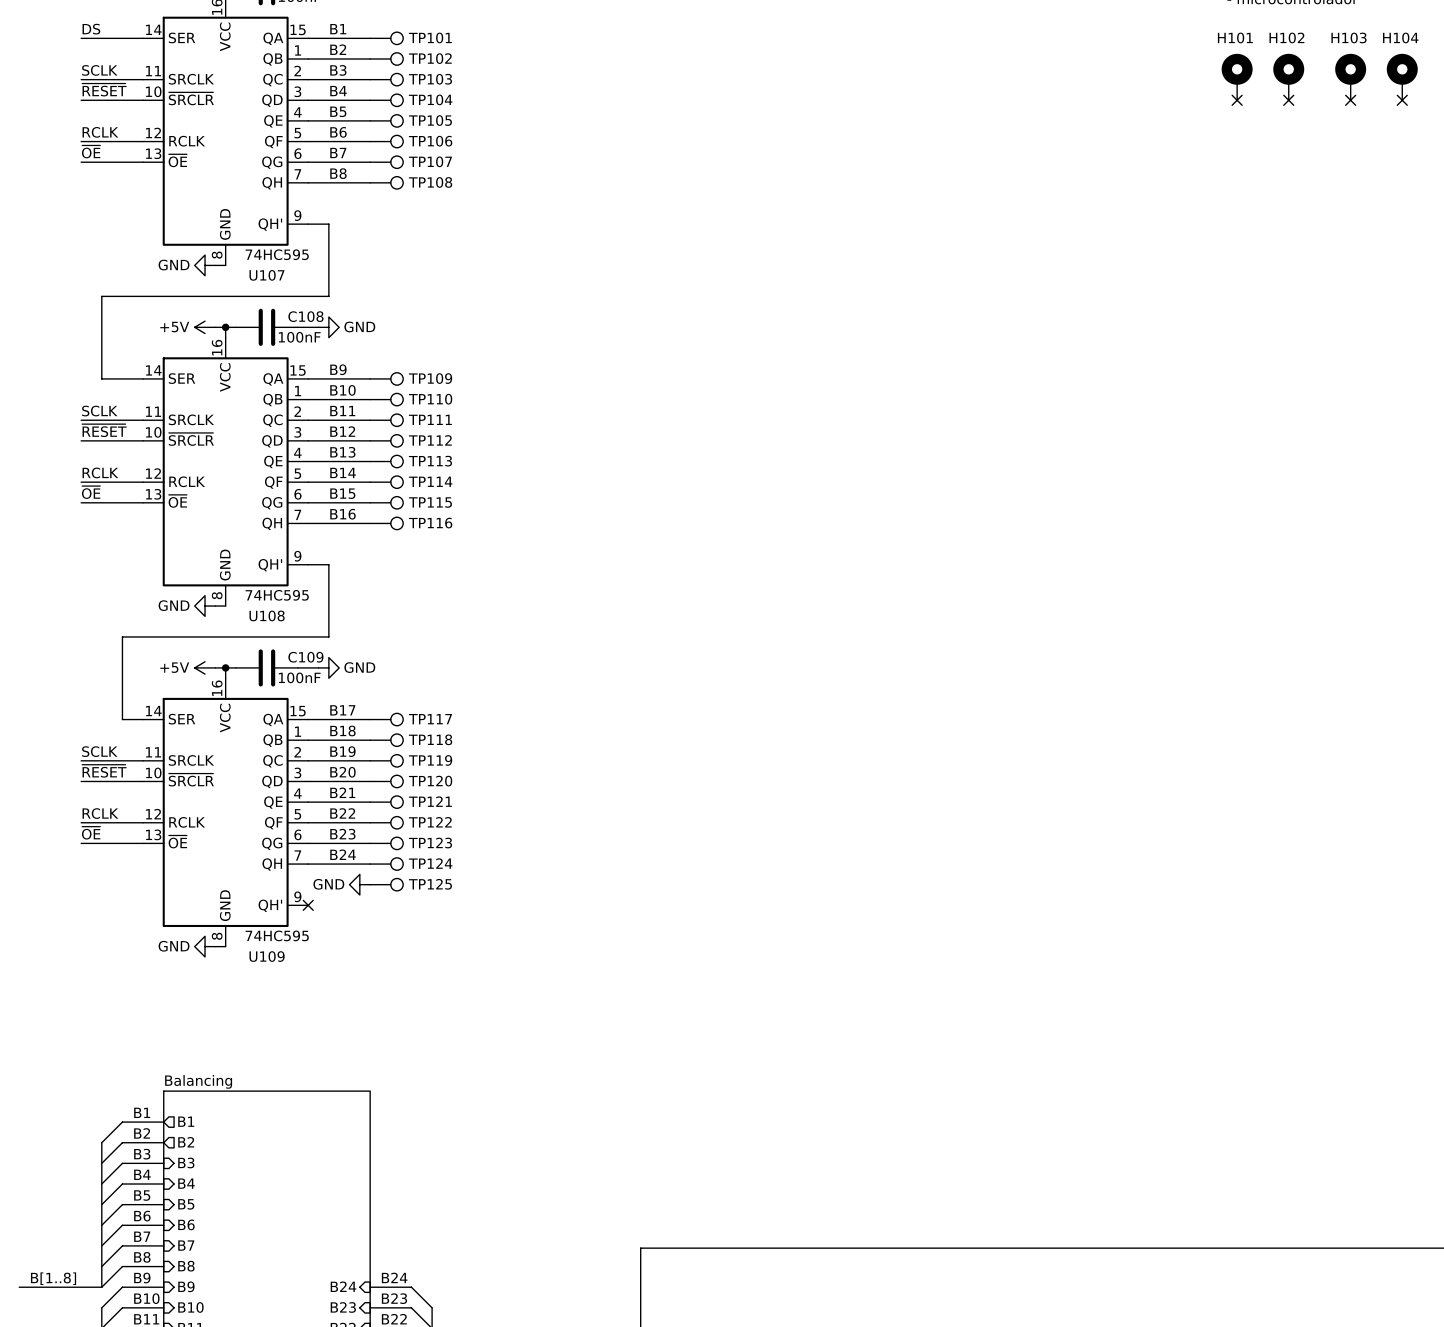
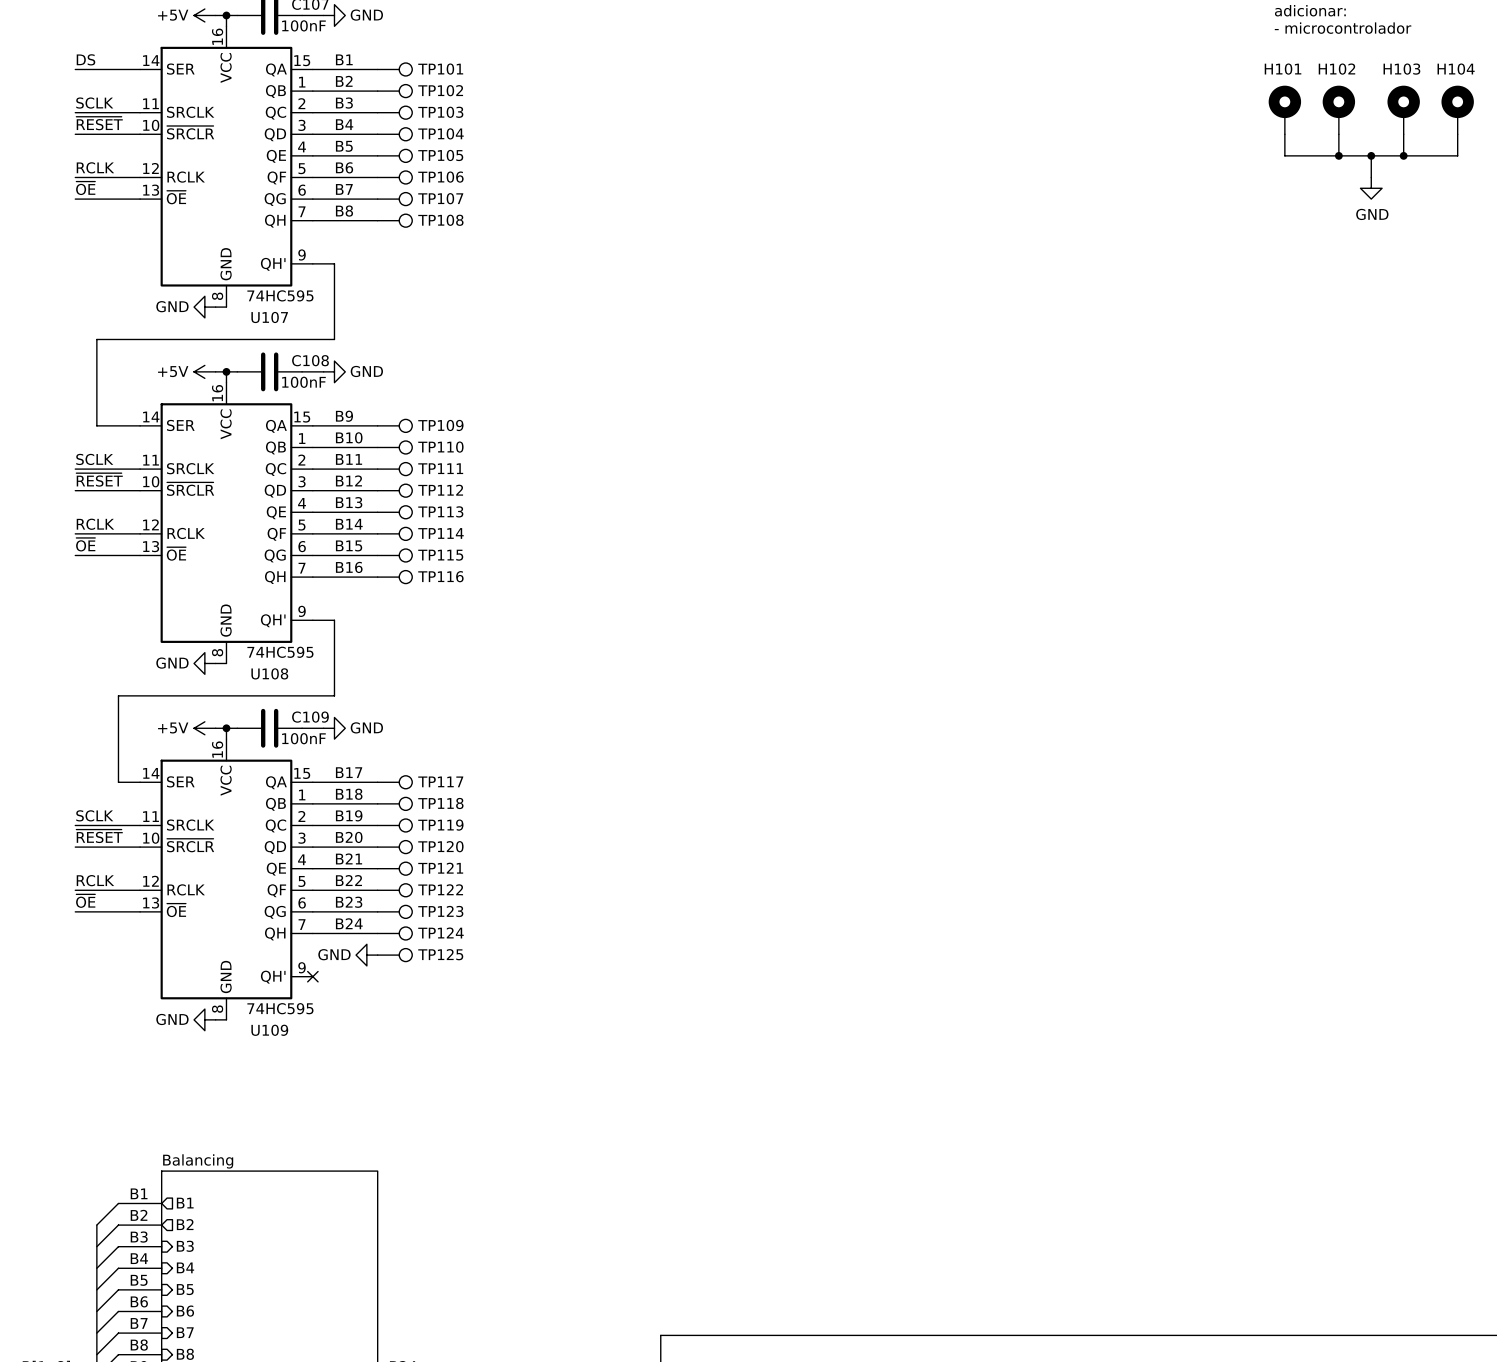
wire: none -> (1284, 134) (1284, 155) (1457, 155) (1457, 134)
no-connect mark: (1237, 100) -> none
wire: none -> (1338, 134) (1338, 155)
no-connect mark: (1288, 100) -> none
wire: none -> (1403, 134) (1403, 155)
no-connect mark: (1350, 100) -> none
no-connect mark: (1402, 100) -> none
junction: none -> (1338, 155)
wire: none -> (1371, 155) (1371, 177)
junction: none -> (1371, 155)
junction: none -> (1403, 155)
power symbol: none -> GND (1371, 188)

